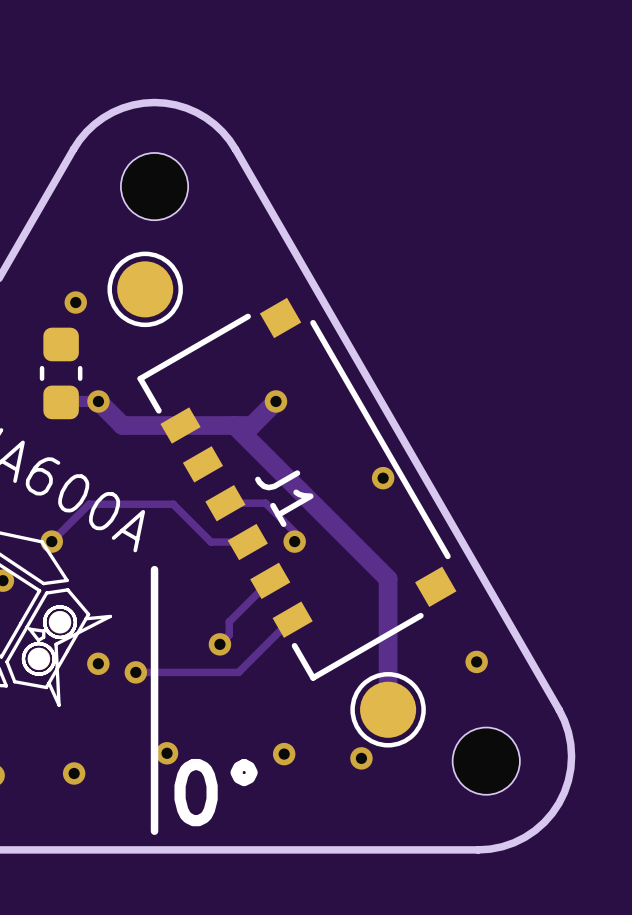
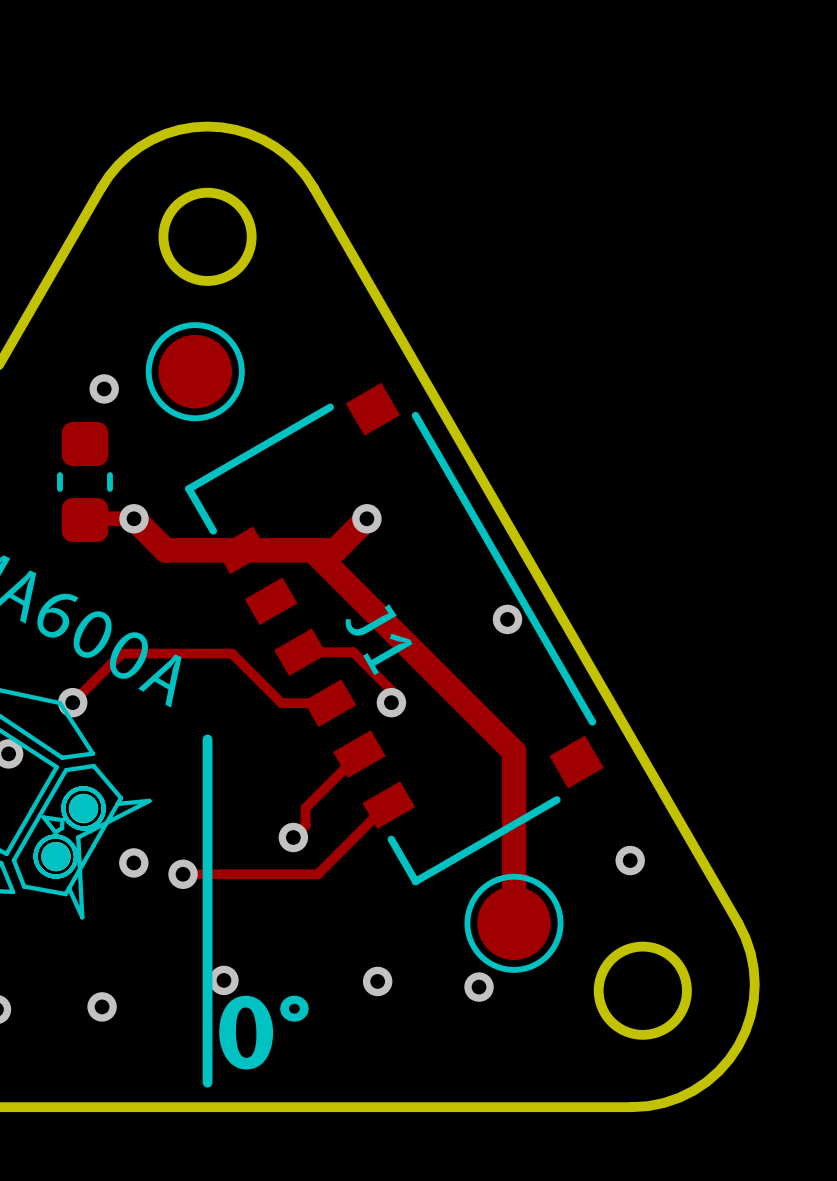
round board edge: none -> [158, 187, 257, 286]
part: (154, 186) -> none
round board edge: none -> [593, 941, 692, 1040]
part: (486, 761) -> none

